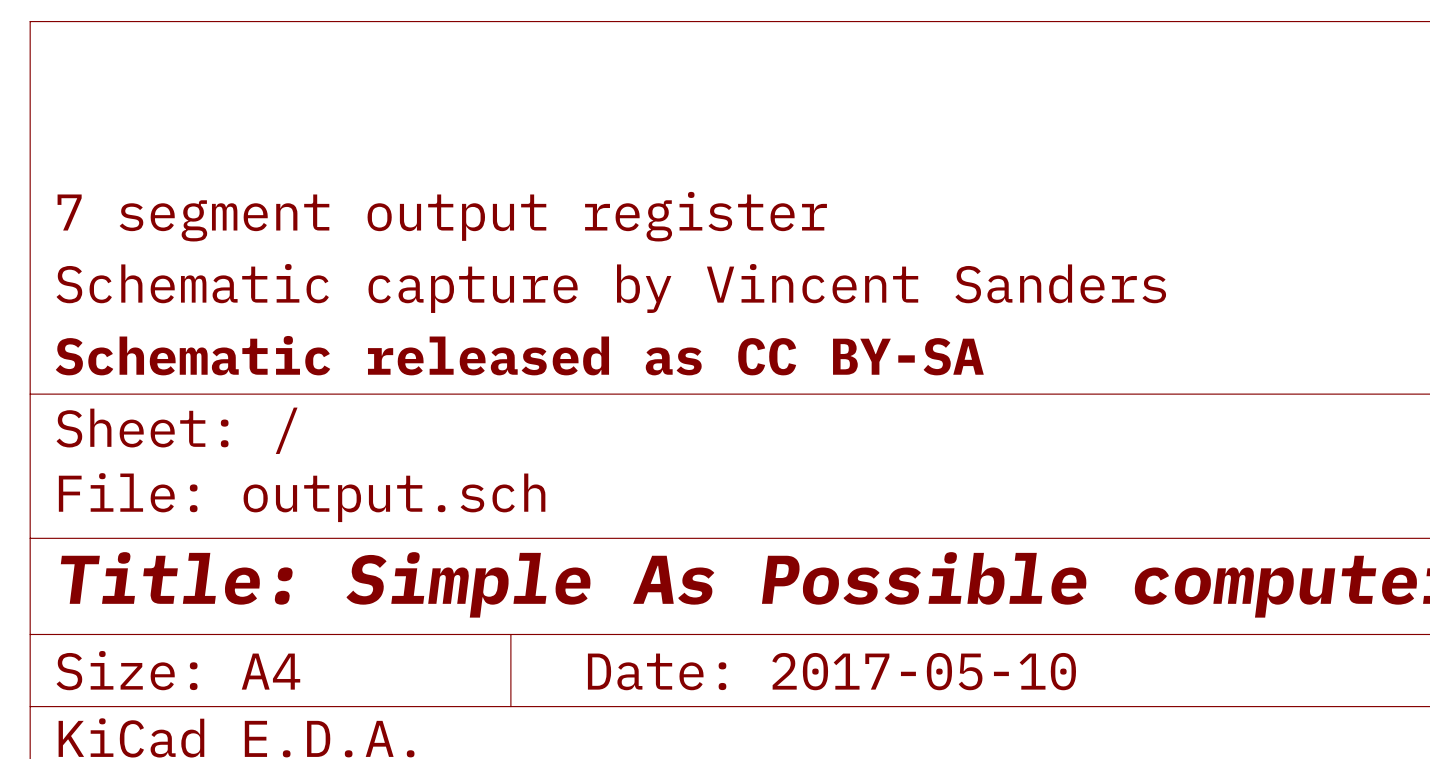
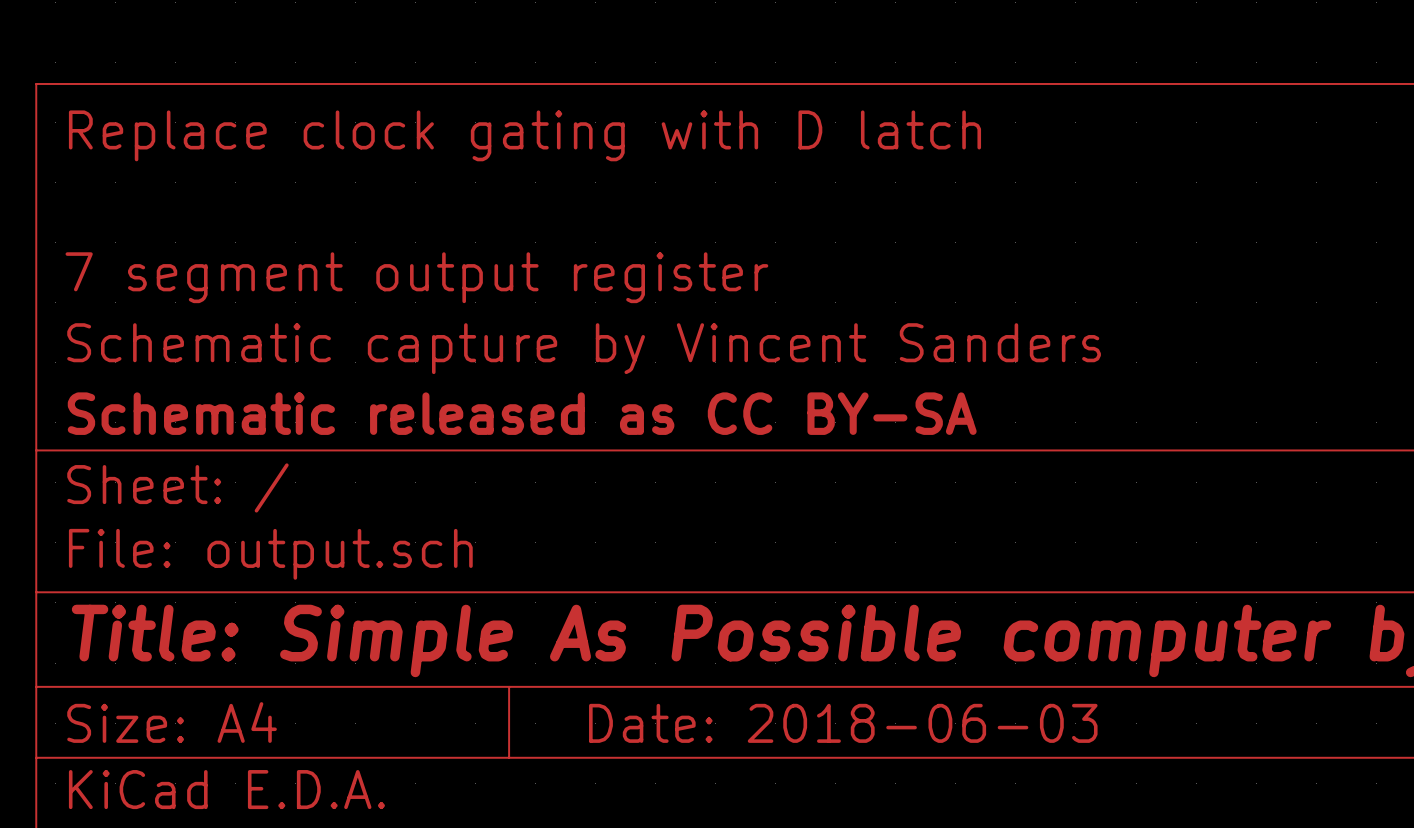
title block: none -> Replace clock gating with D latch (524, 135)
title block: Date: 2017-05-10 (831, 671) -> Date: 2018-06-03 (843, 723)

